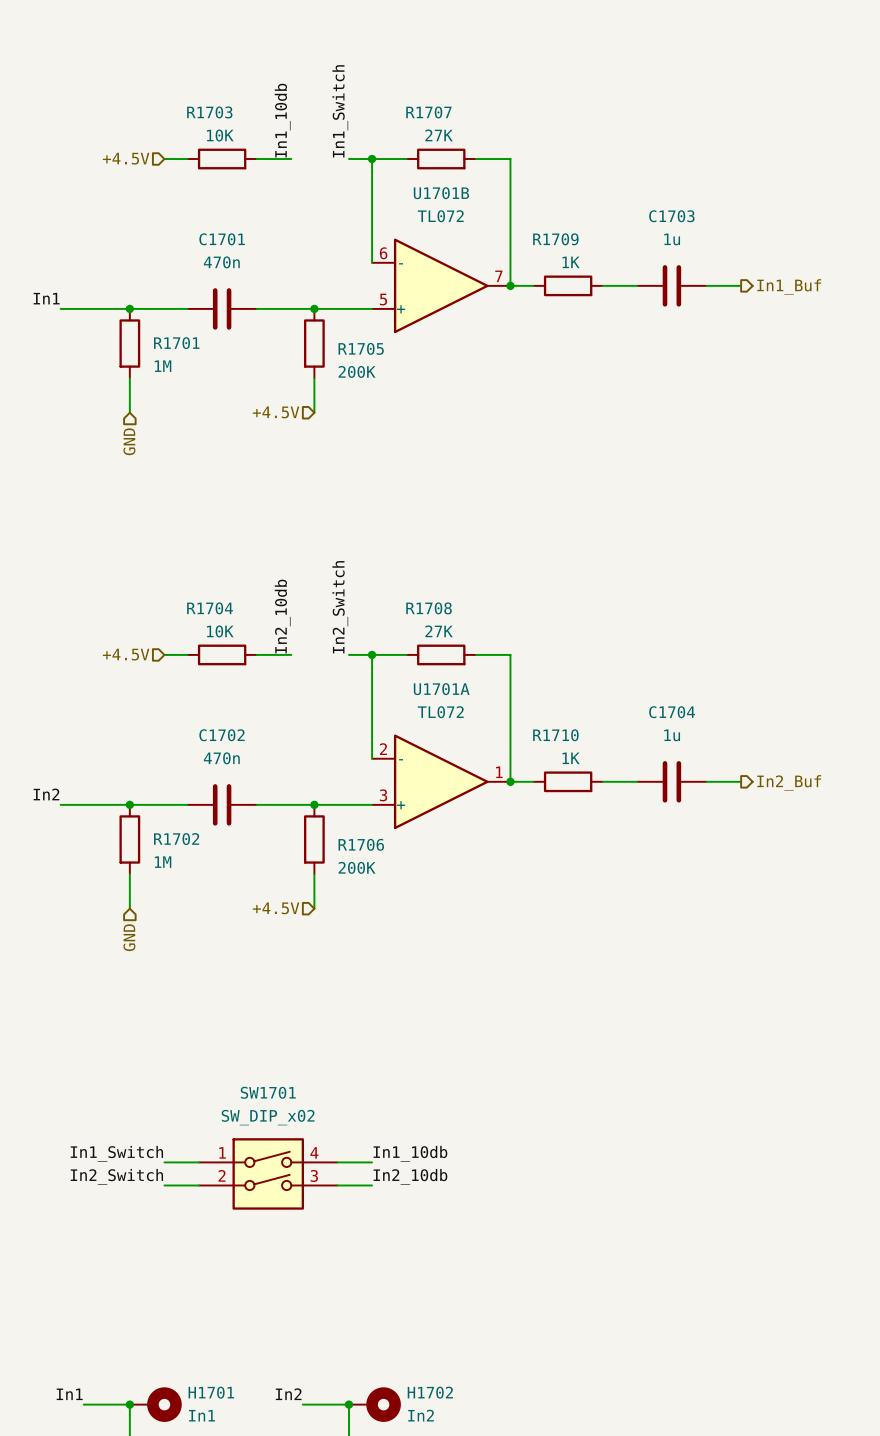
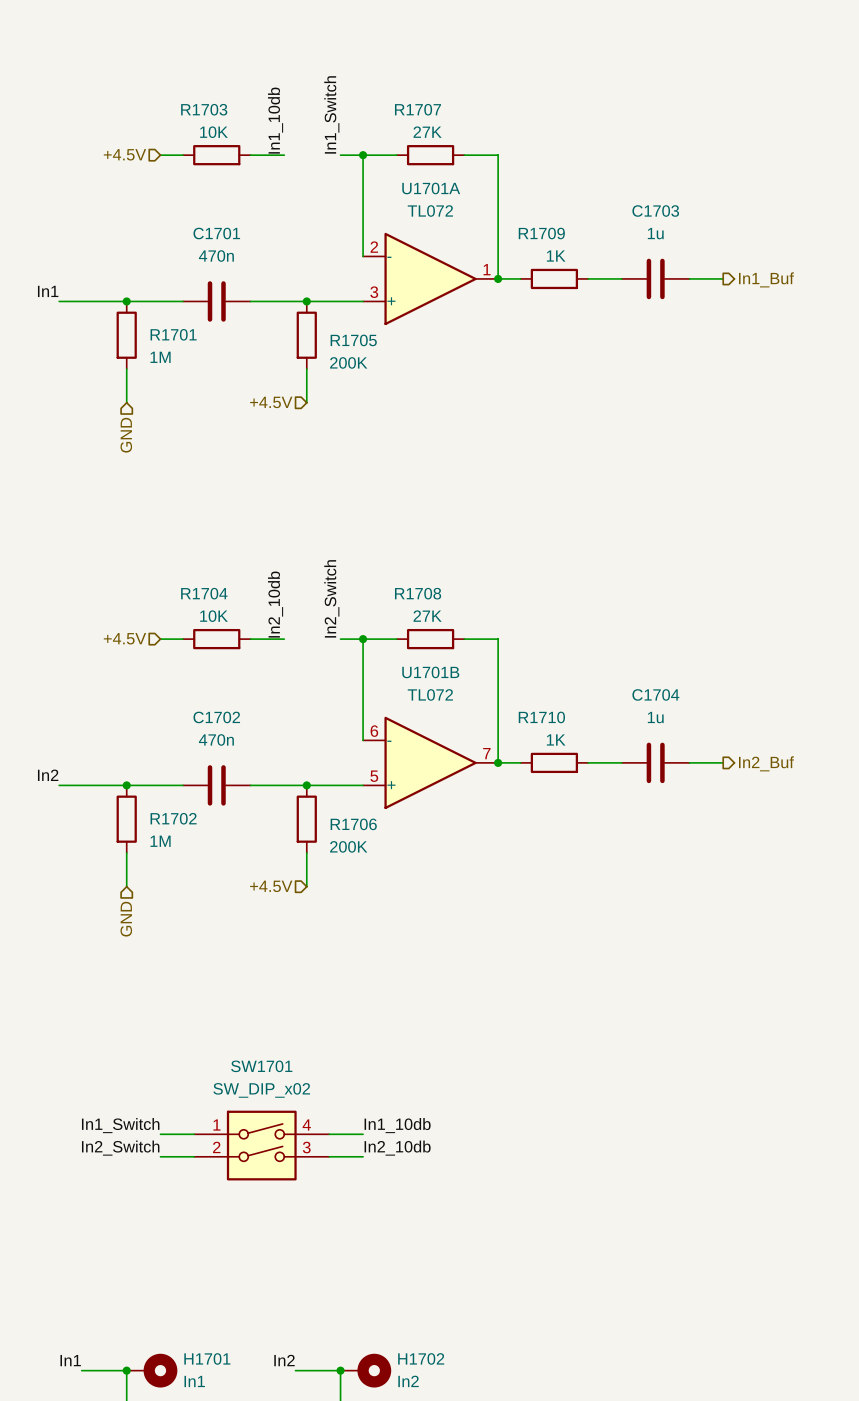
U1701B position: (441, 285) -> (430, 762)
U1701A position: (441, 781) -> (430, 278)

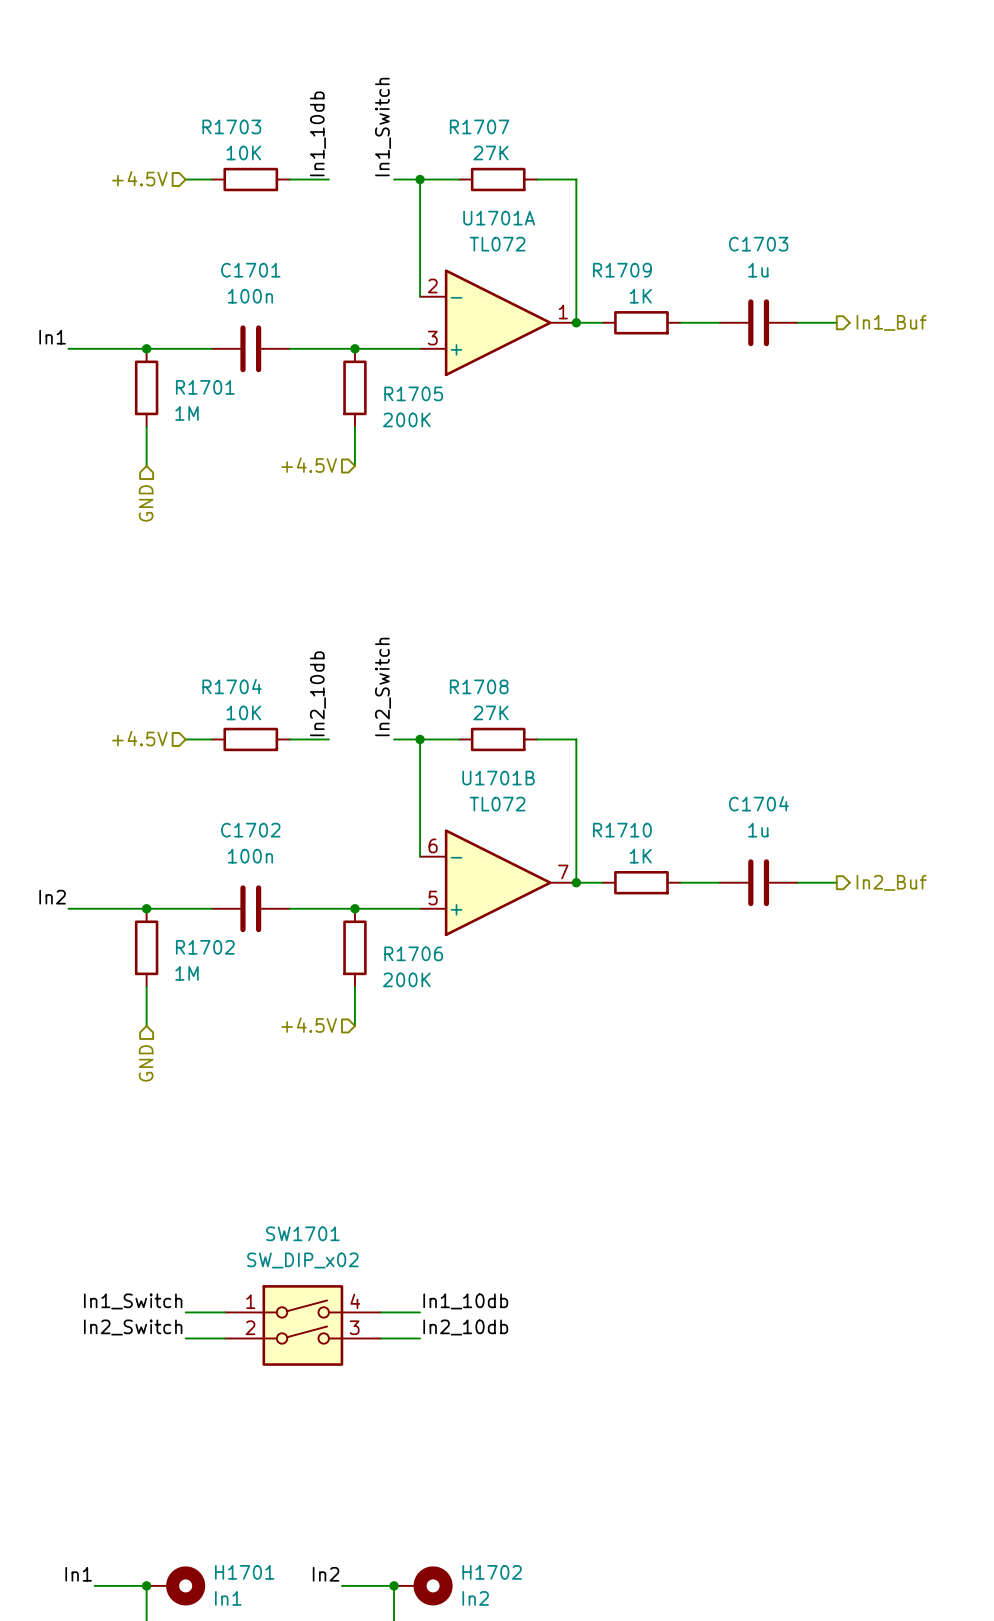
C1701 value: 470n (216, 256) -> 100n (250, 296)
C1702 value: 470n (216, 739) -> 100n (250, 856)

